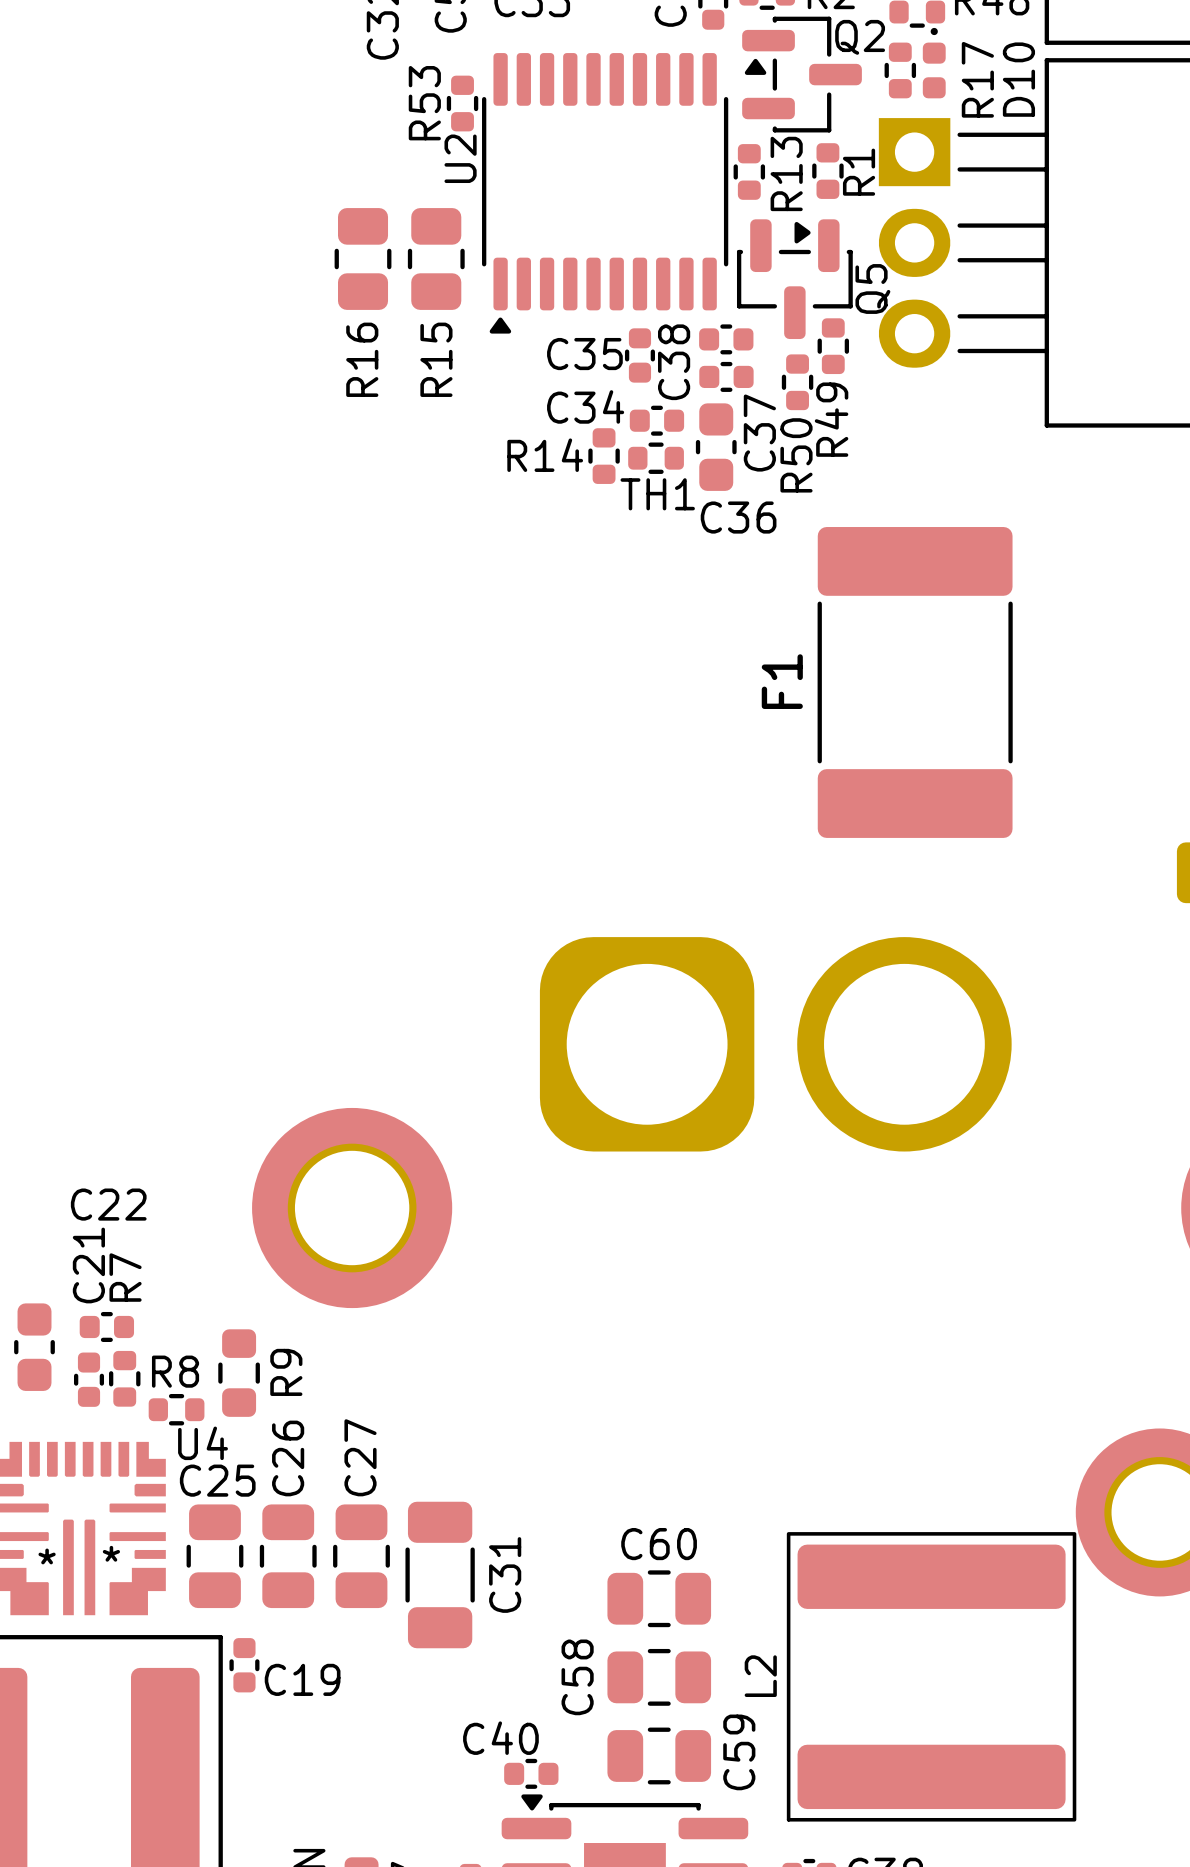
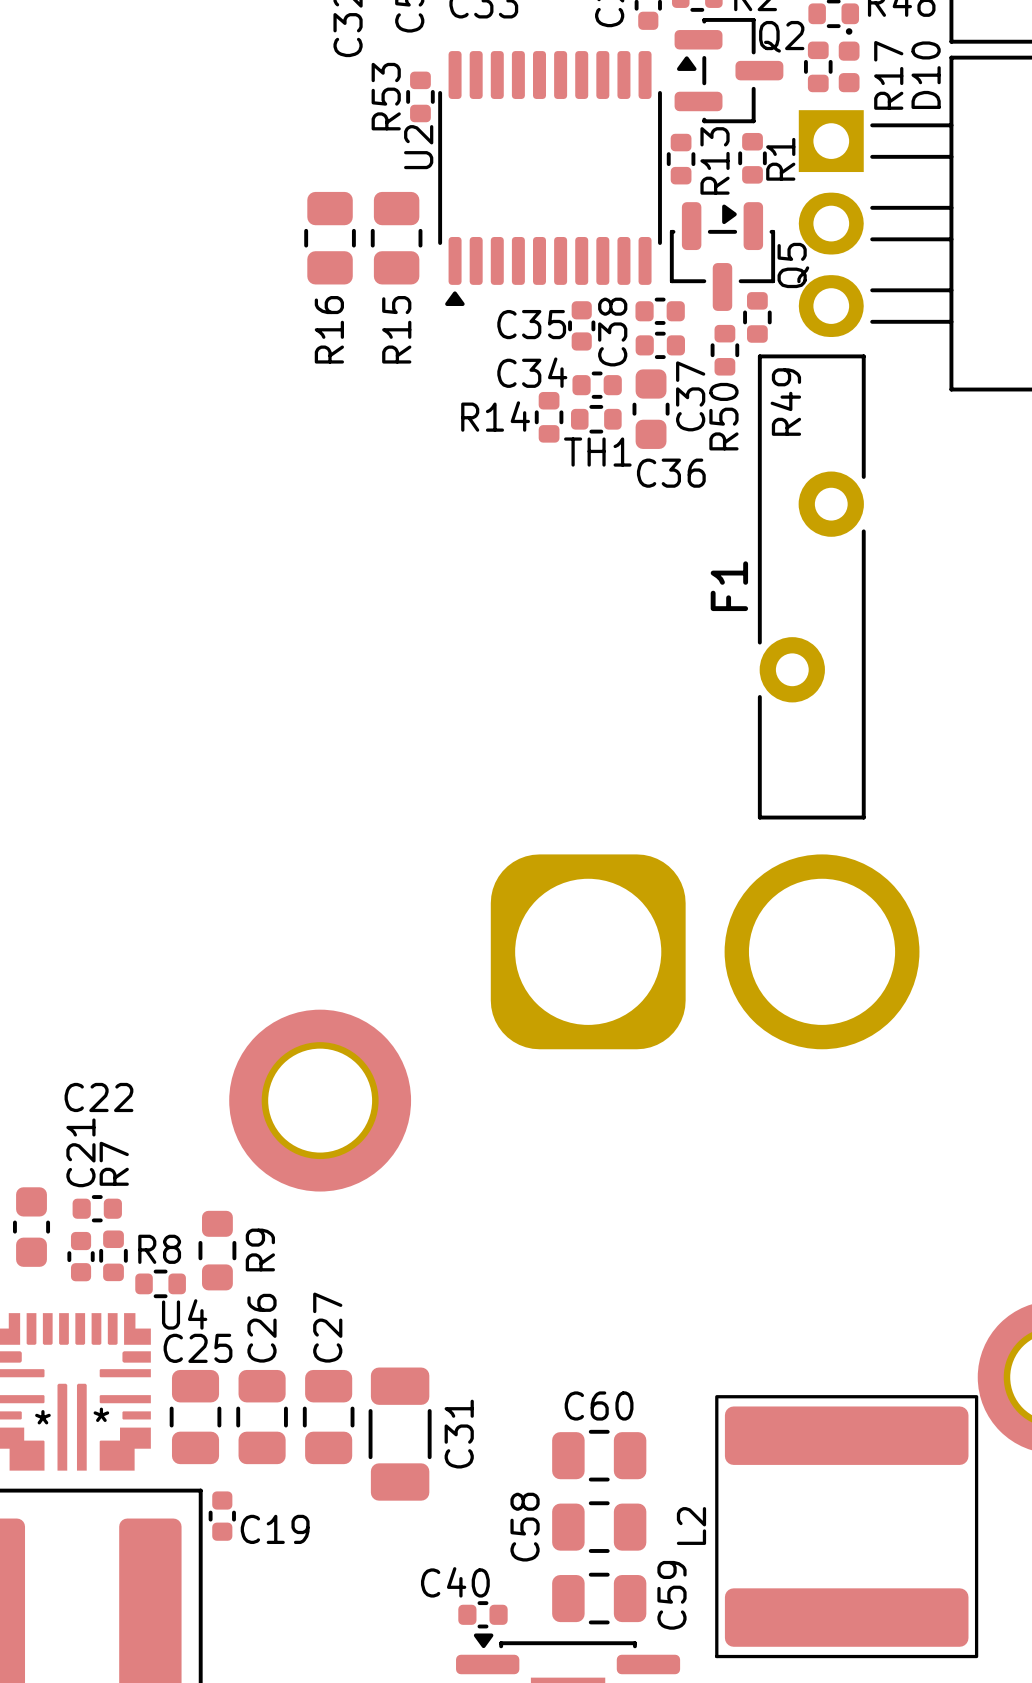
R49 name position: R49 (831, 419) -> R49 (785, 402)
F1 footprint: [817, 527, 1013, 838] -> [757, 354, 866, 820]

